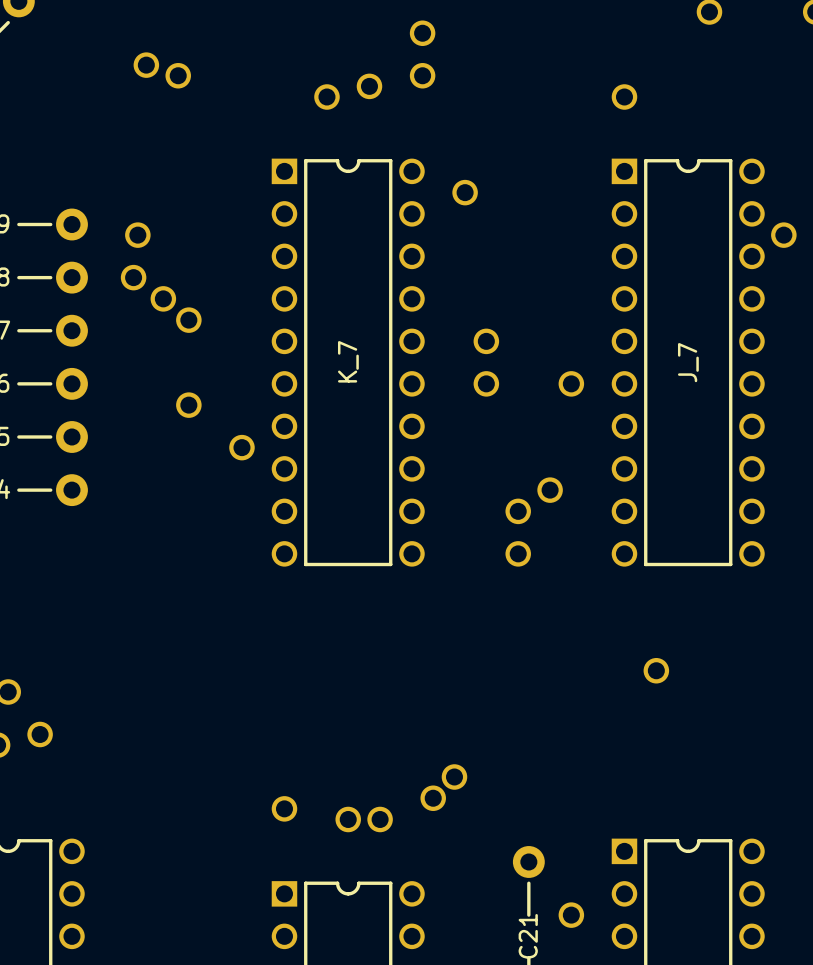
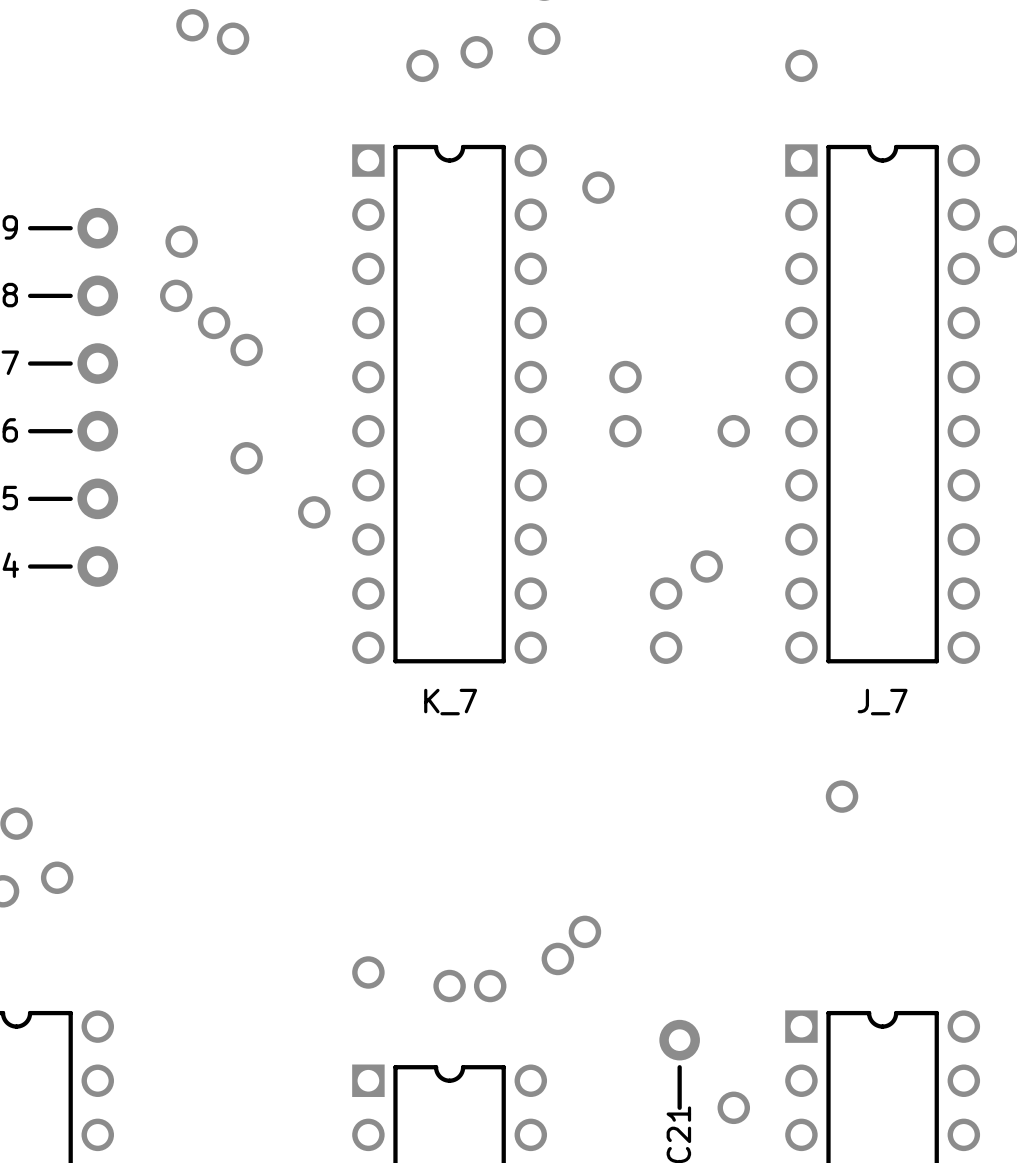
K_7 name rotation: 0° (348, 361) -> 90° clockwise (450, 702)
K_7 name position: K_7 (348, 361) -> K_7 (450, 702)
J_7 name rotation: 0° (688, 362) -> 90° clockwise (882, 702)
J_7 name position: J_7 (688, 362) -> J_7 (882, 702)

